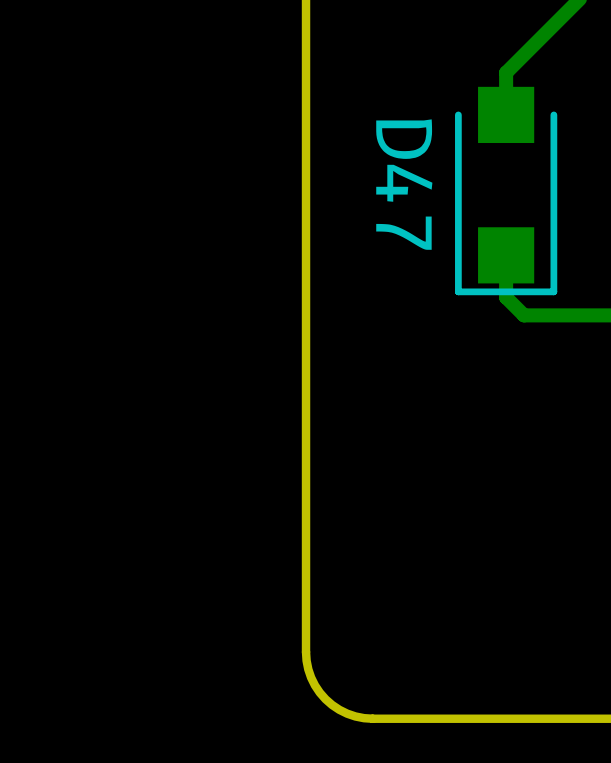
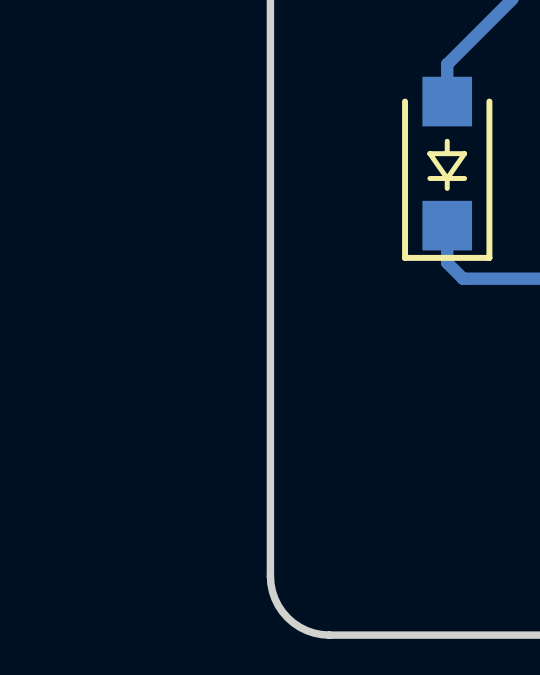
D47: (506, 191) -> none
part: none -> (447, 168)

